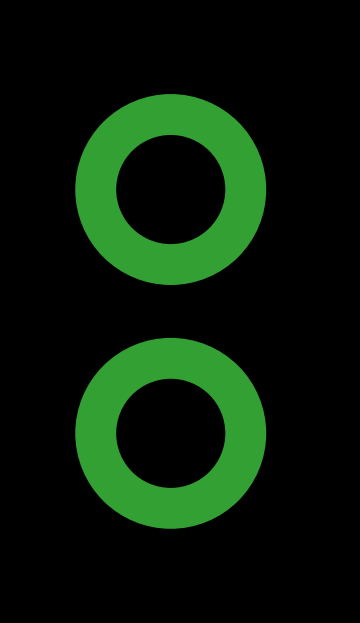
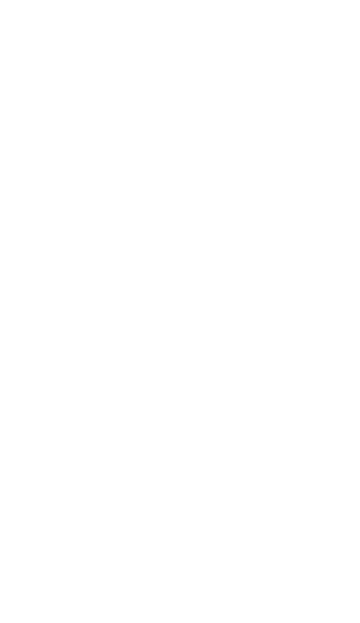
part: (170, 189) -> none
part: (170, 433) -> none

